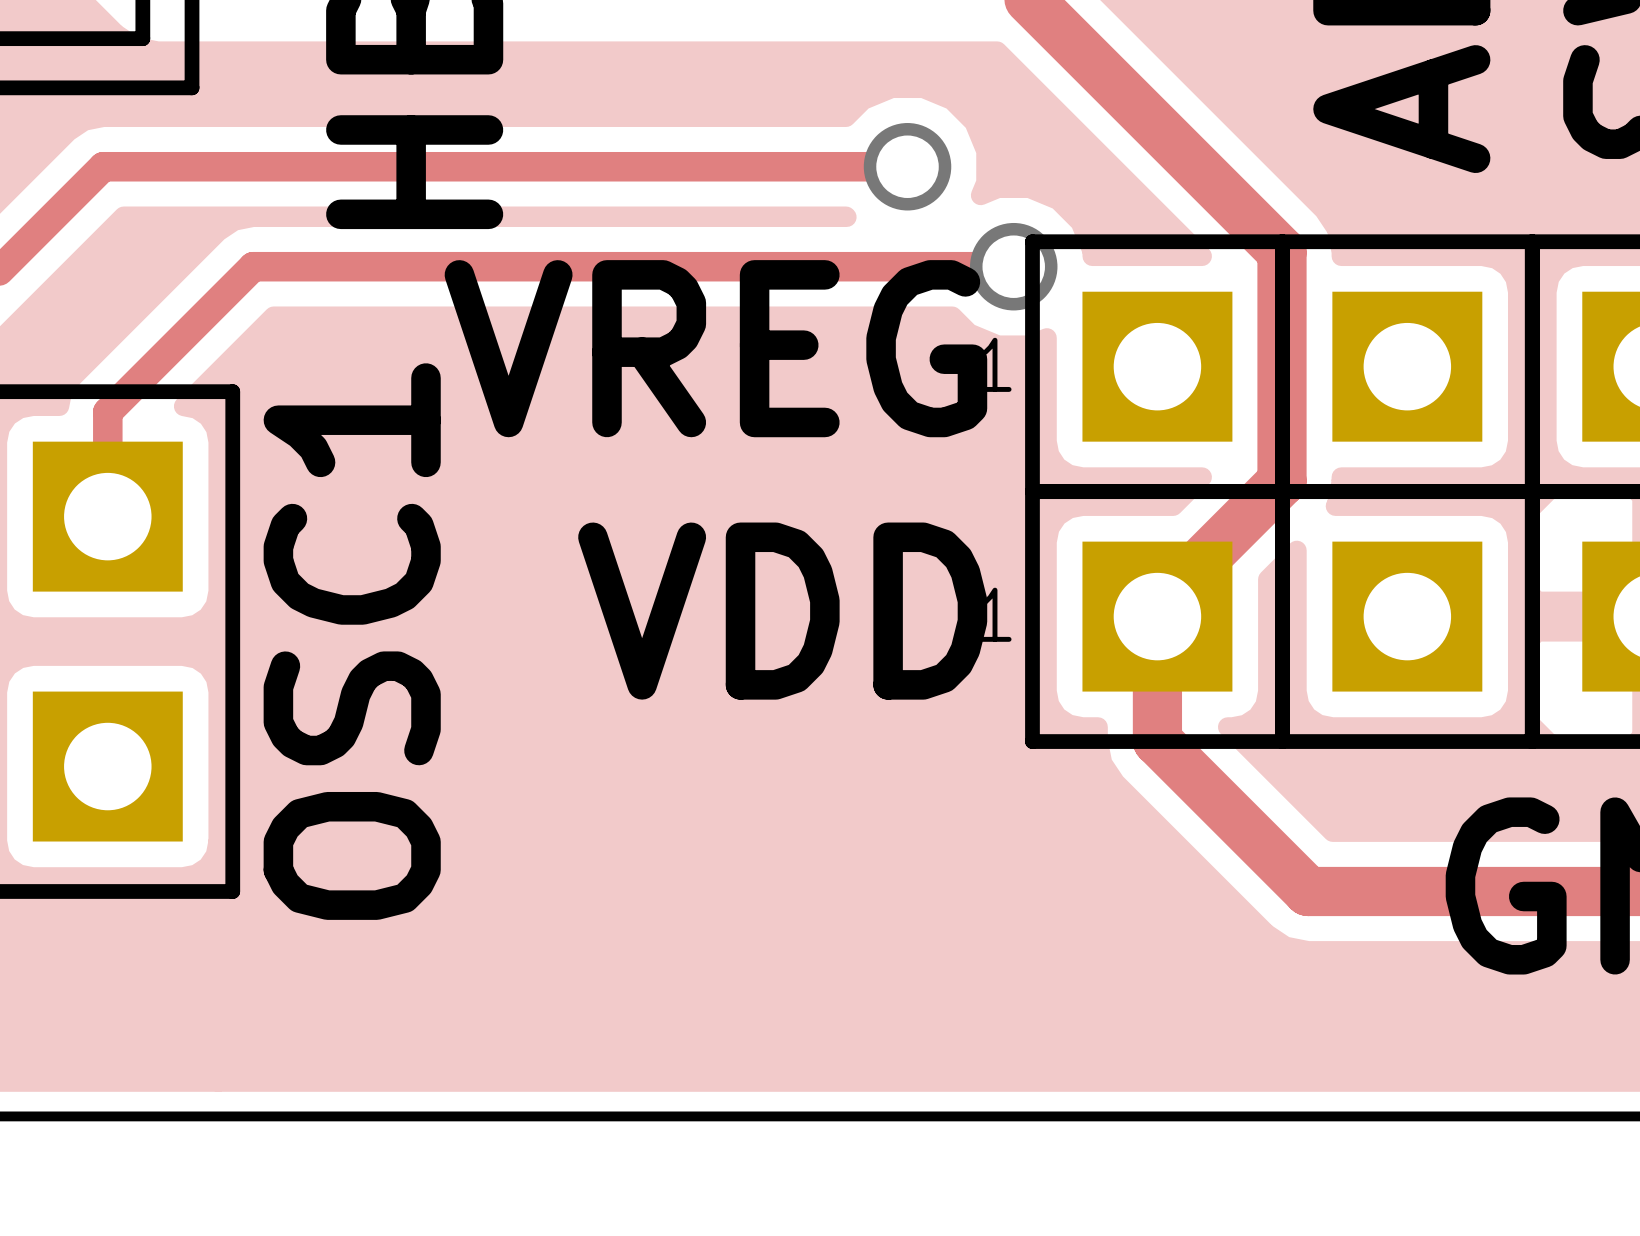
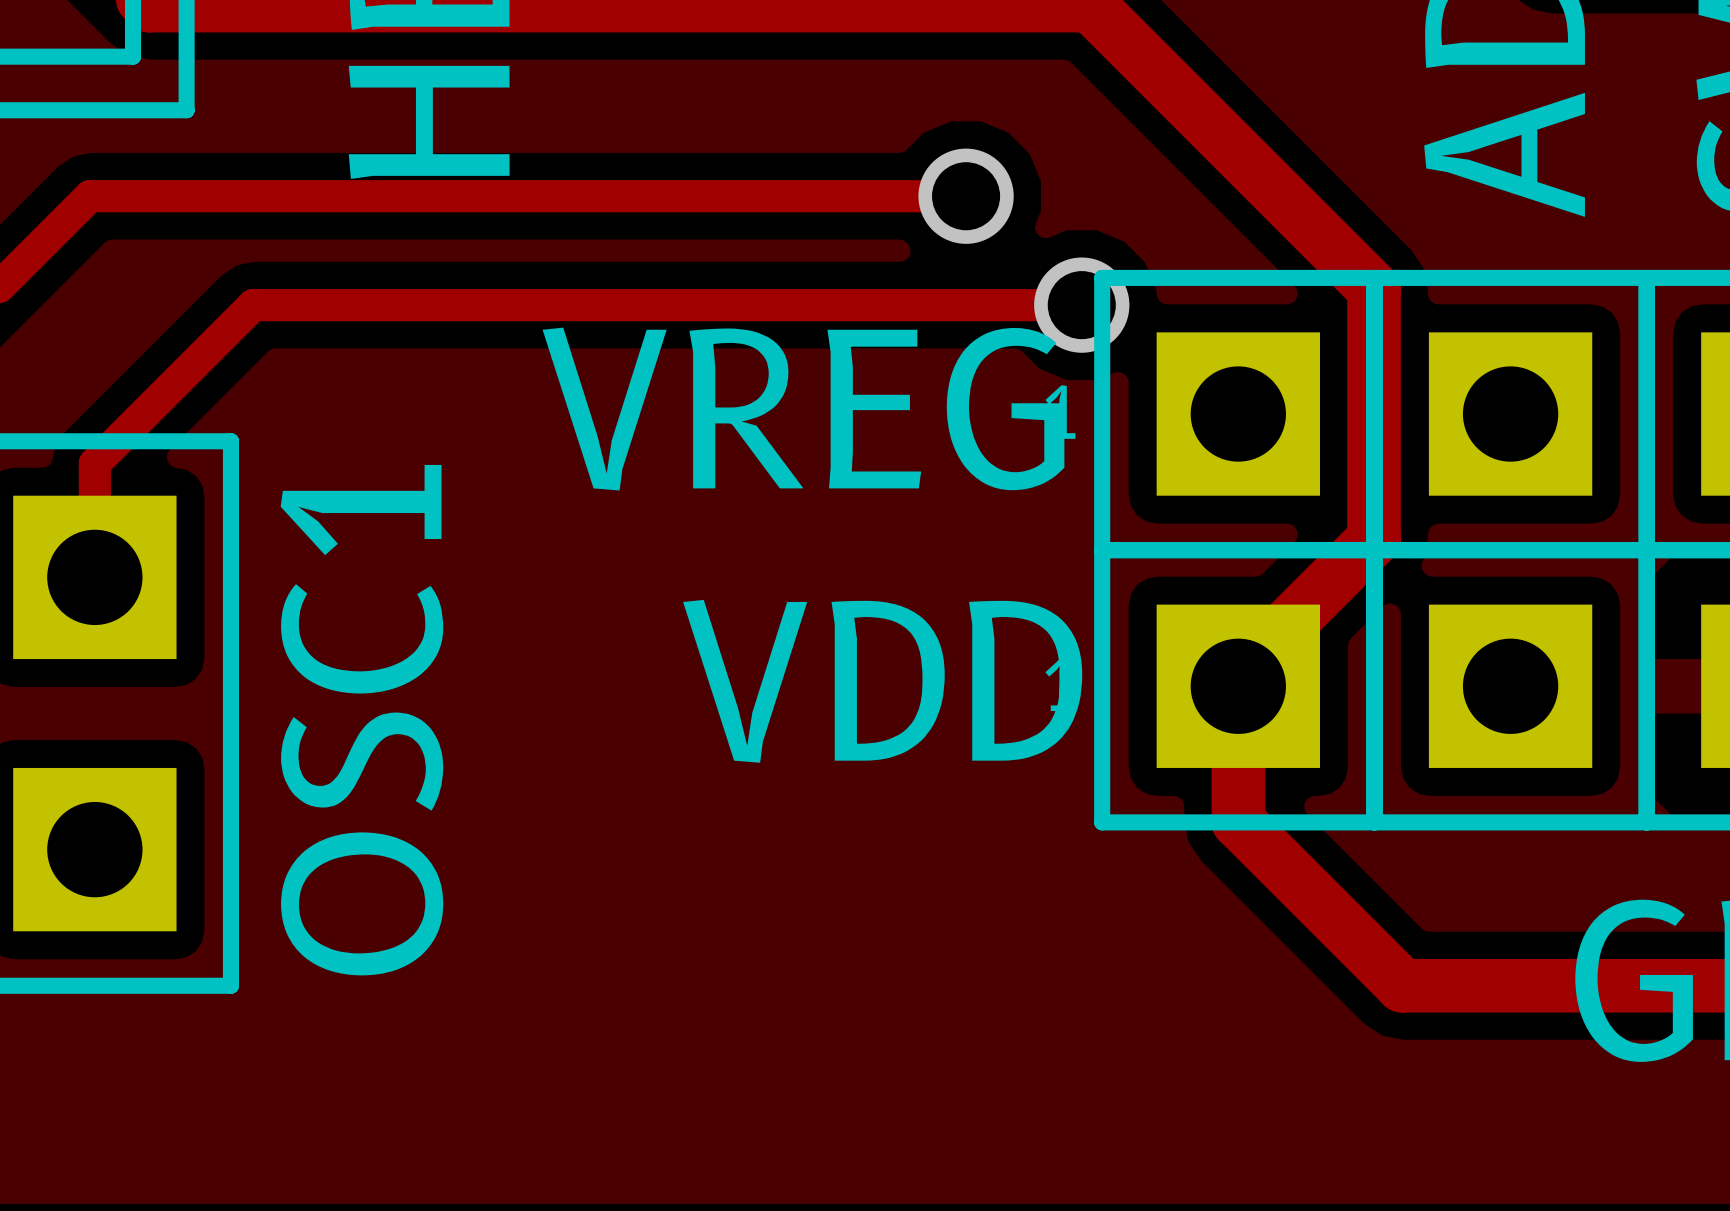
text position: VREG (715, 348) -> VREG (803, 409)

